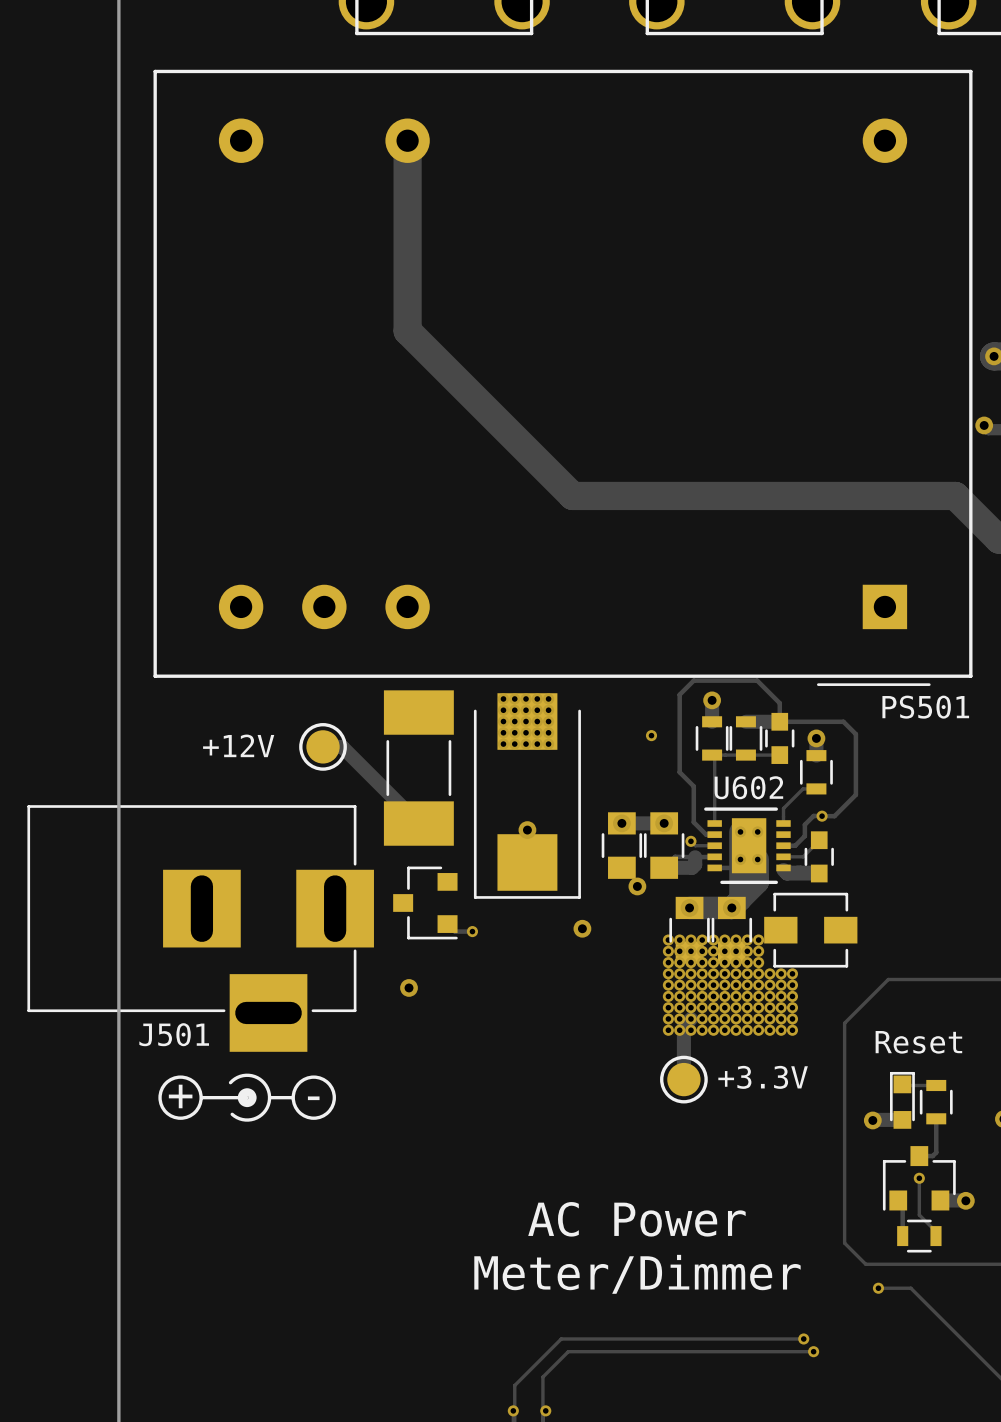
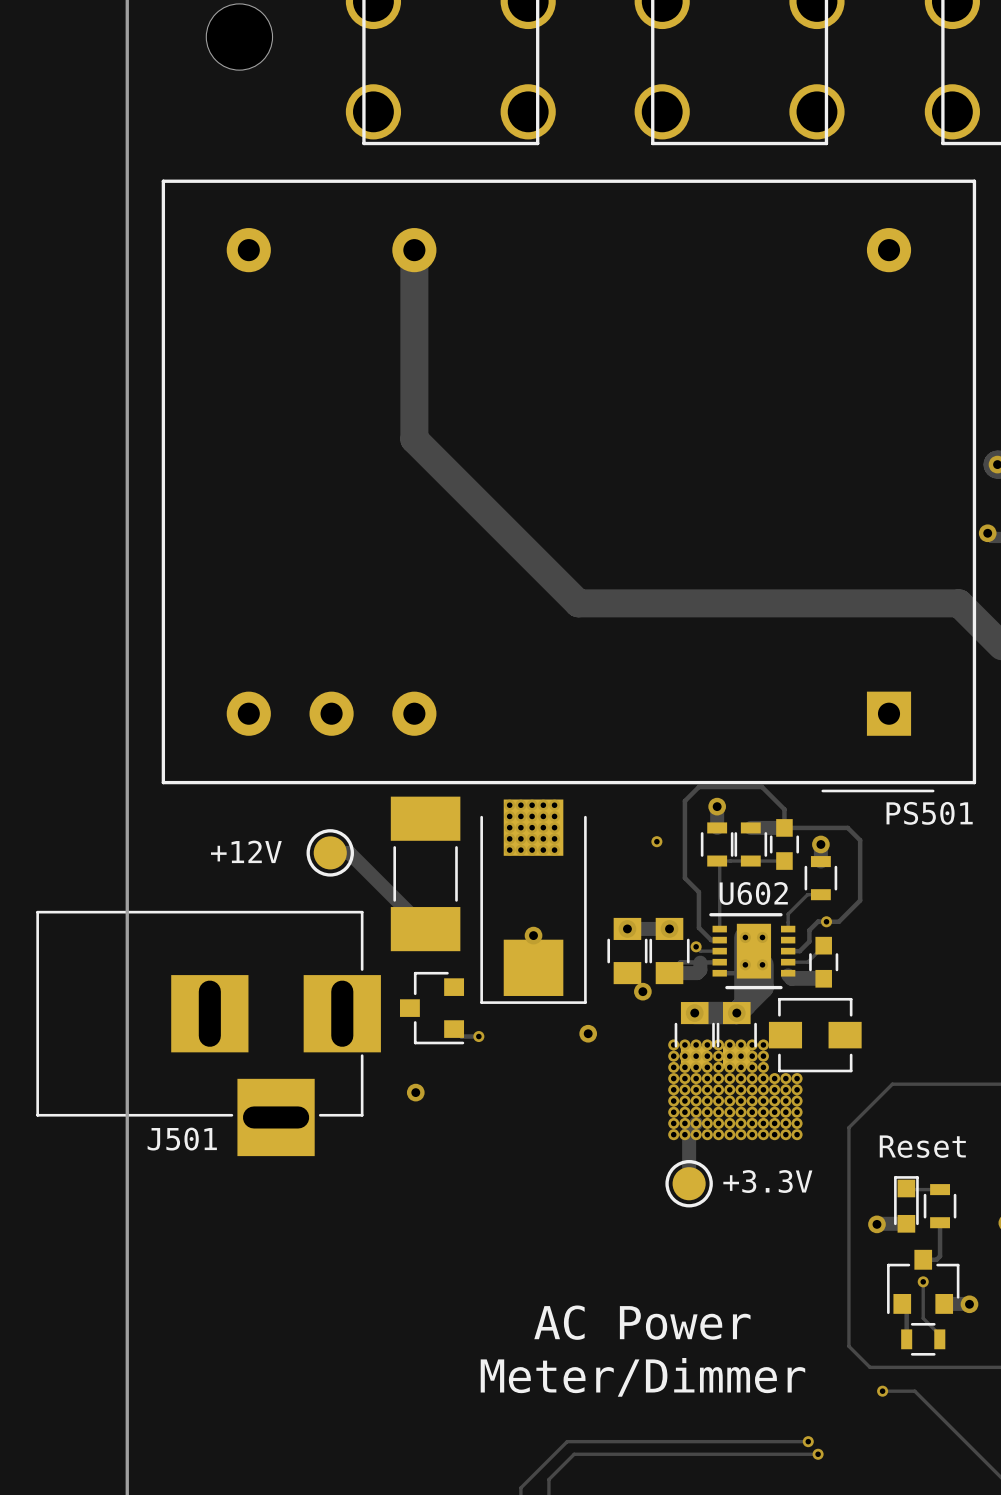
drawing: [158, 1073, 336, 1122] -> none
text: + (180, 1096) -> none
text: - (313, 1098) -> none

